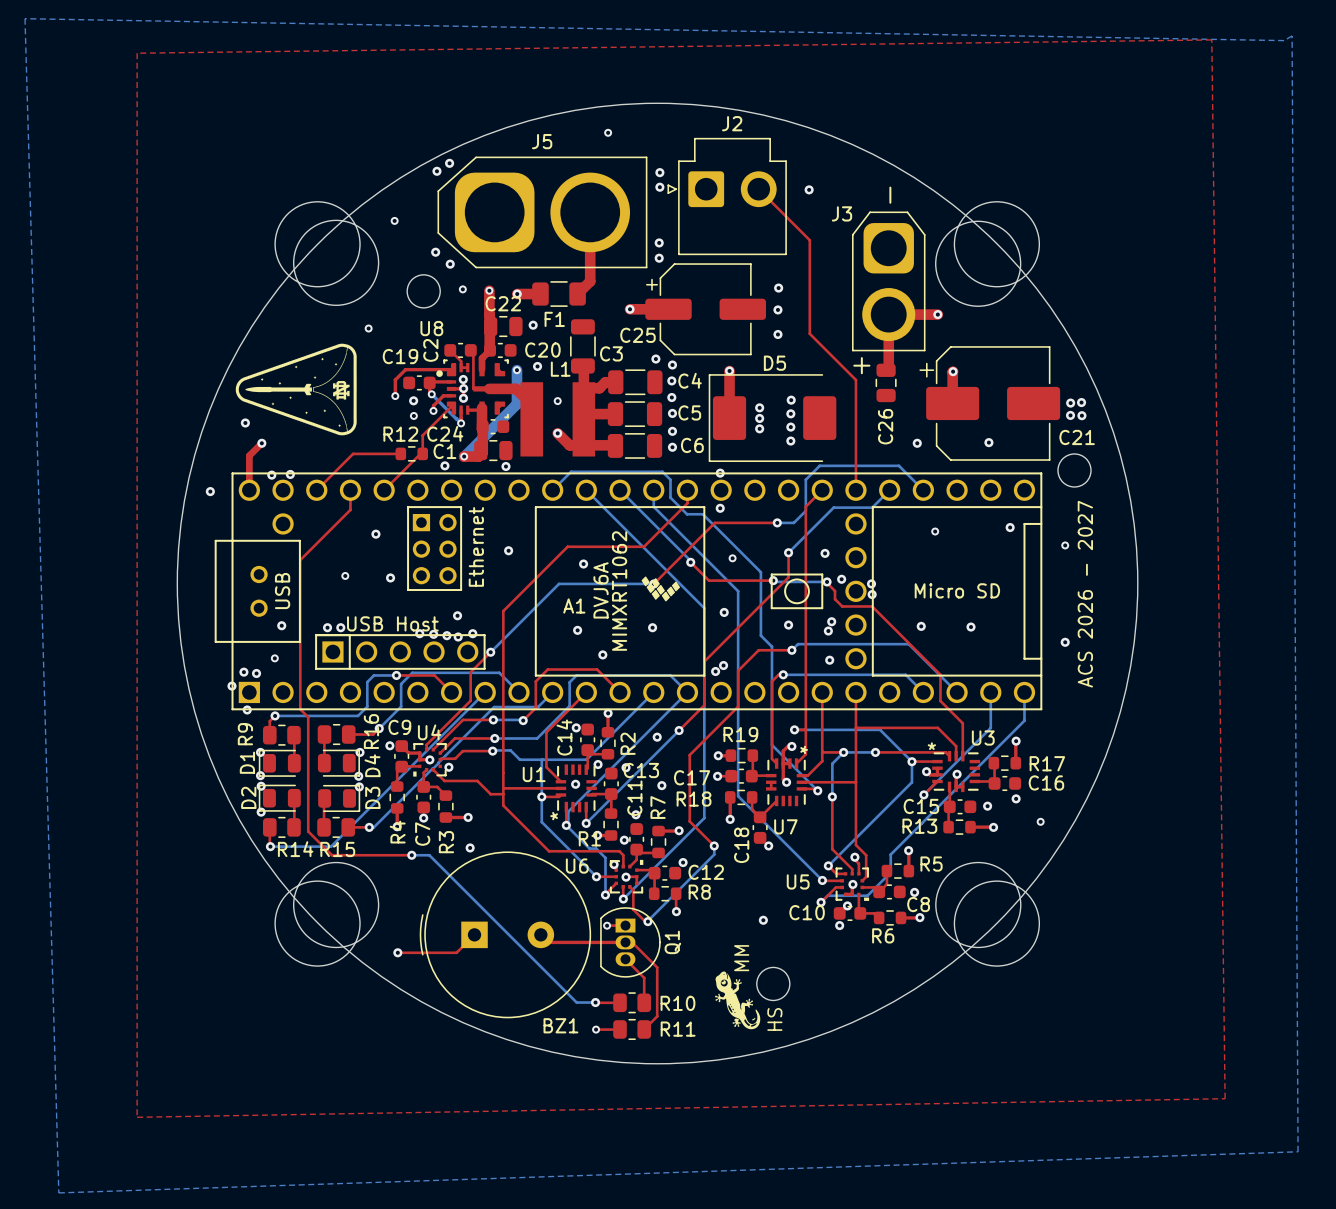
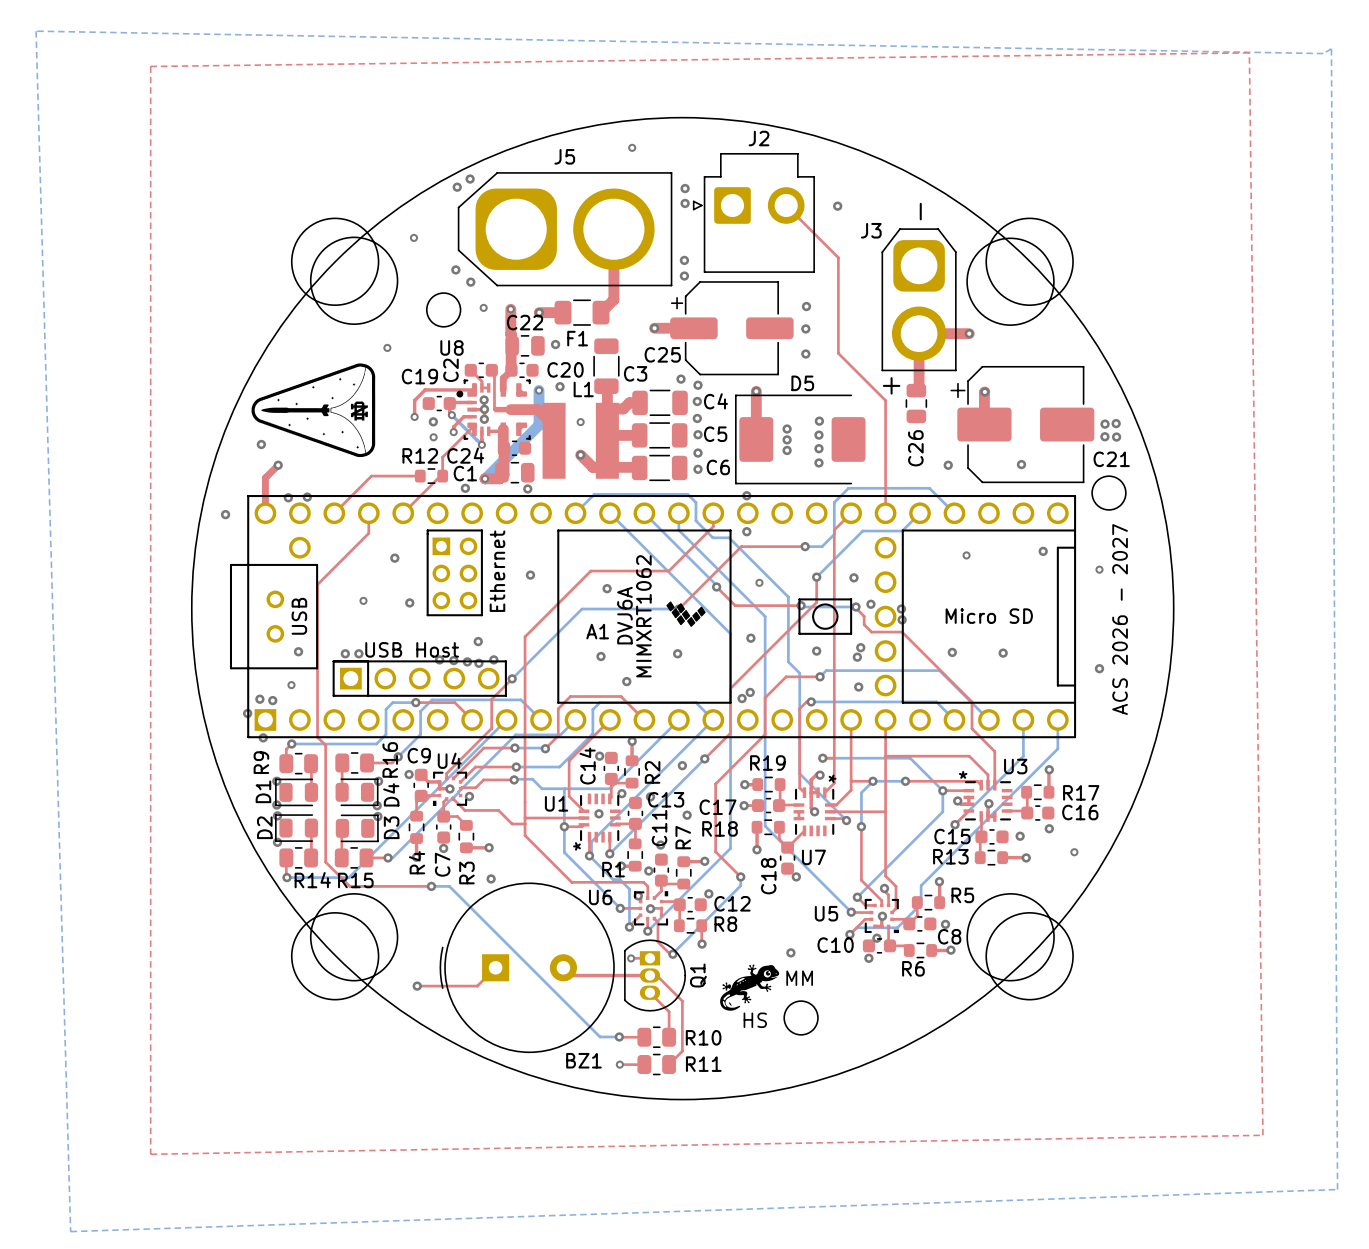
drawing: none -> [720, 964, 780, 1011]
text rotation: 0° (741, 958) -> 90° clockwise (799, 978)
drawing: [715, 971, 761, 1030] -> none
text rotation: 0° (774, 1019) -> 90° clockwise (755, 1020)
text position: HS (774, 1019) -> HS (755, 1020)

